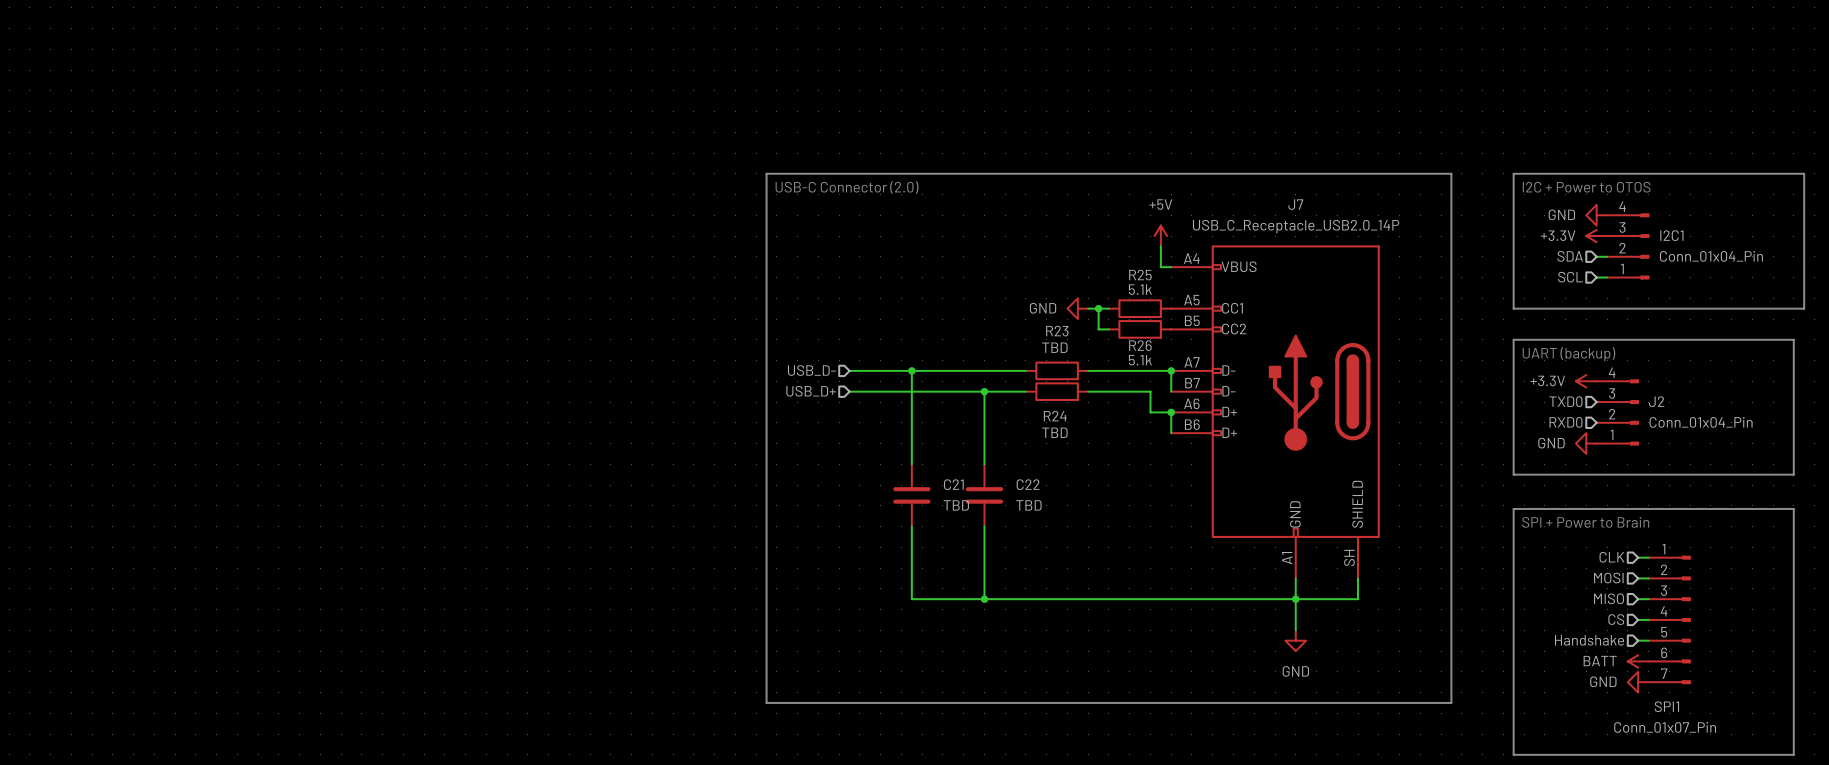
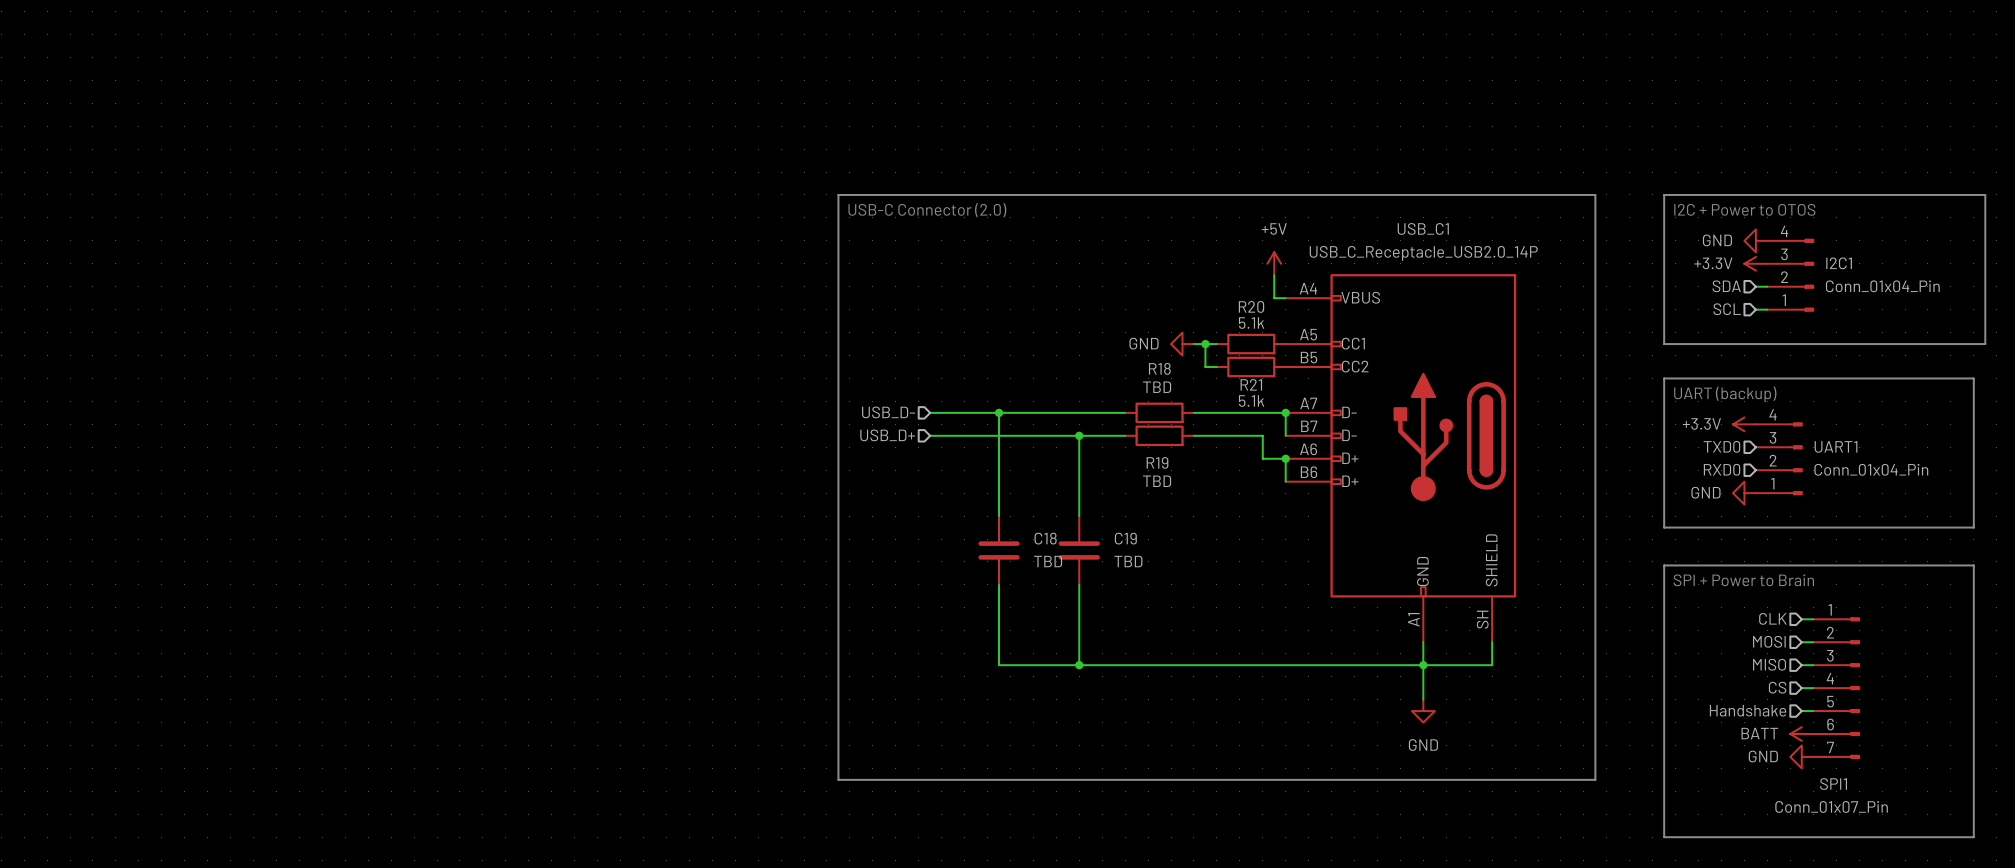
J7 name: J7 (1295, 204) -> USB_C1 (1423, 228)
R25 name: R25 (1140, 275) -> R20 (1251, 306)
R23 name: R23 (1057, 331) -> R18 (1159, 368)
R26 name: R26 (1140, 345) -> R21 (1251, 384)
J2 name: J2 (1656, 401) -> UART1 (1836, 446)
R24 name: R24 (1055, 416) -> R19 (1157, 462)
C21 name: C21 (953, 484) -> C18 (1045, 538)
C22 name: C22 (1028, 484) -> C19 (1125, 538)

